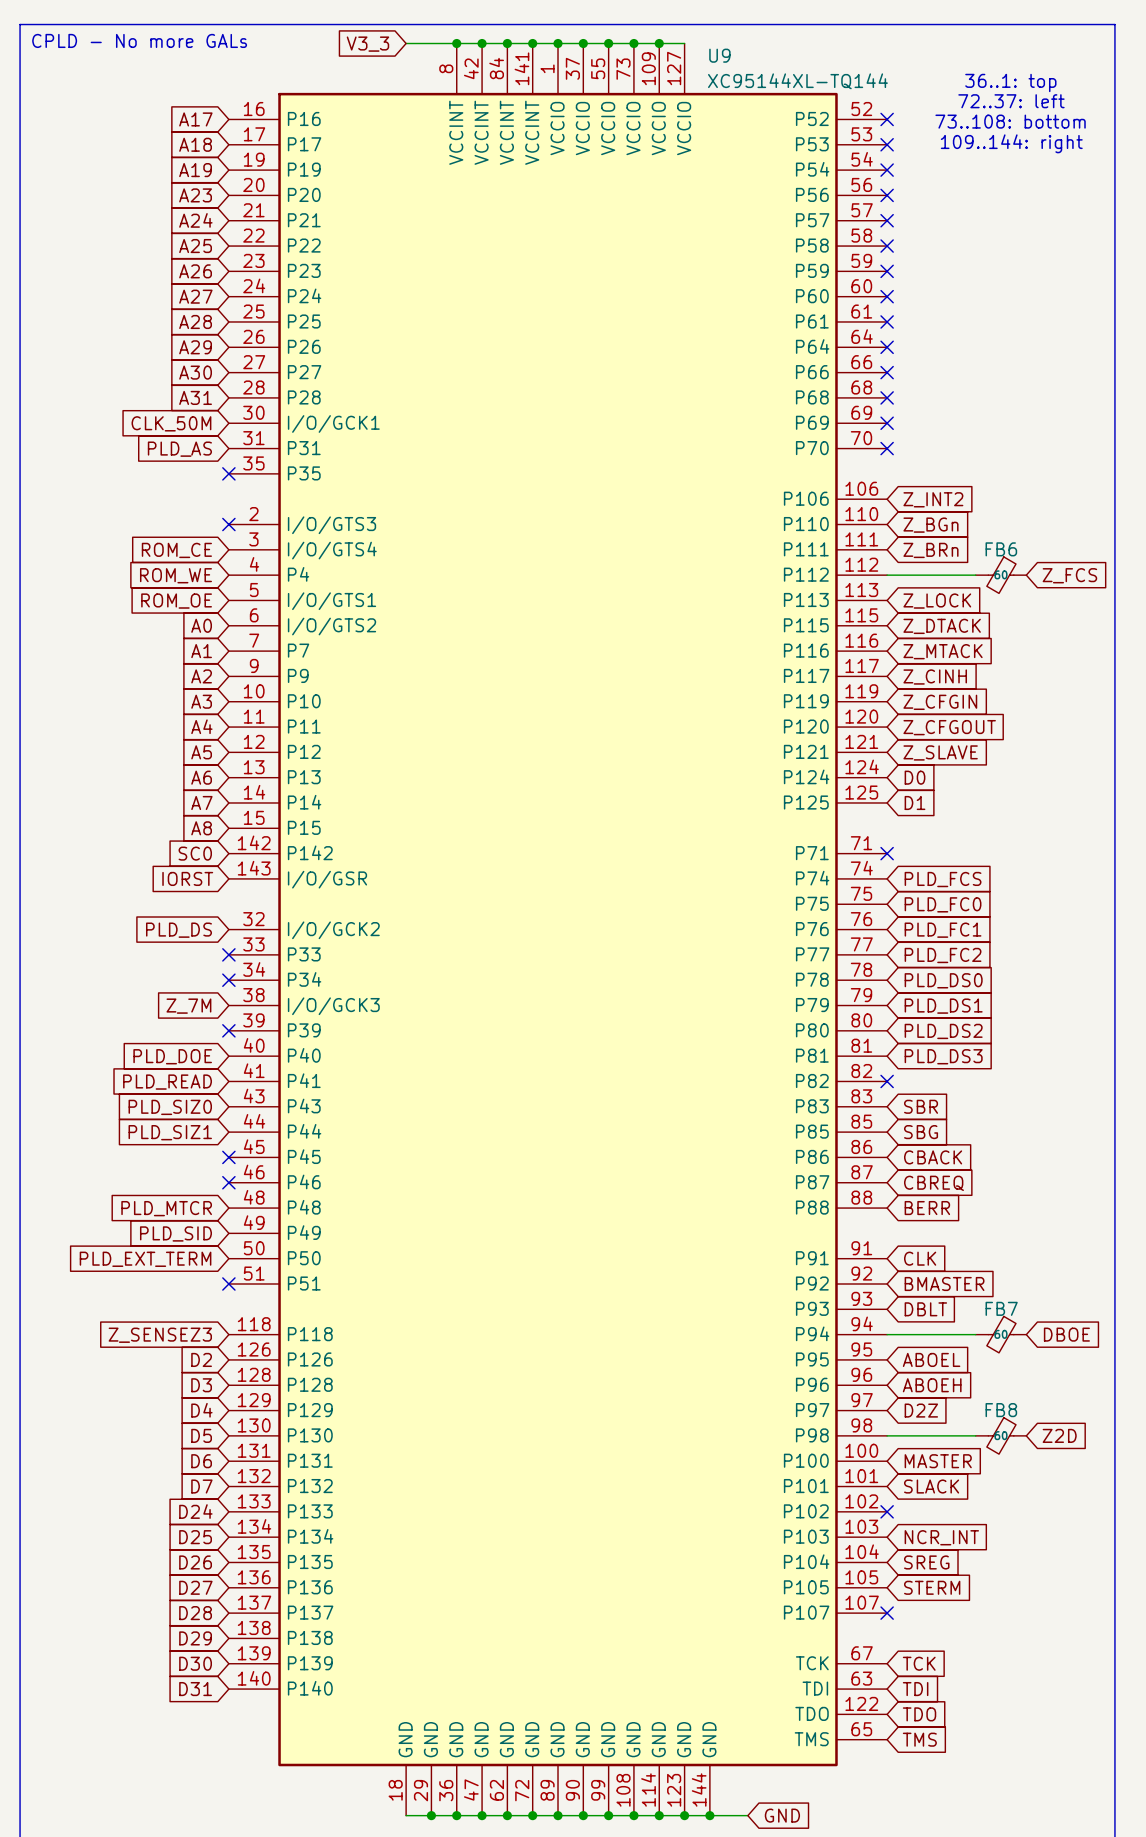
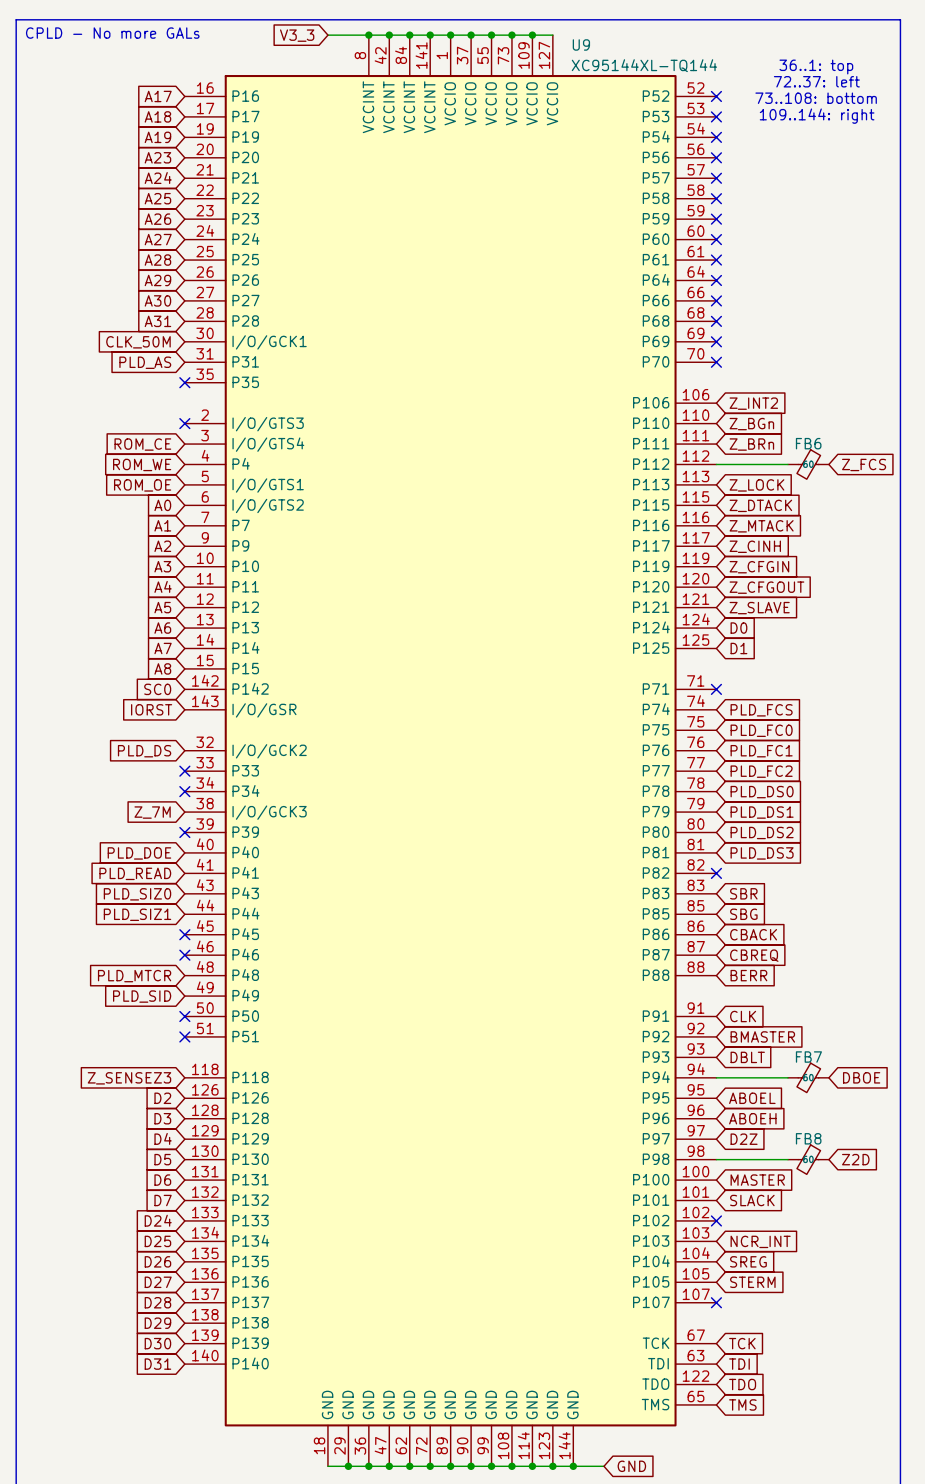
no-connect mark: none -> (184, 1016)
global label: PLD_EXT_TERM (145, 1259) -> none

